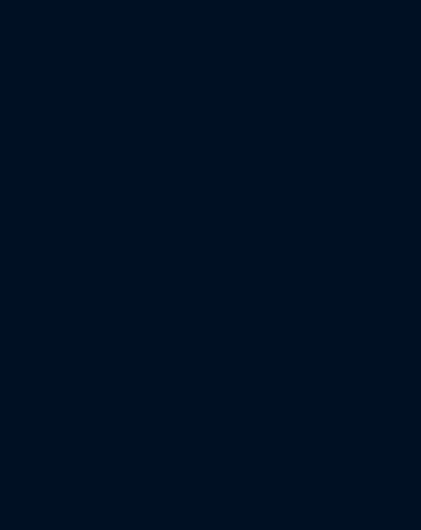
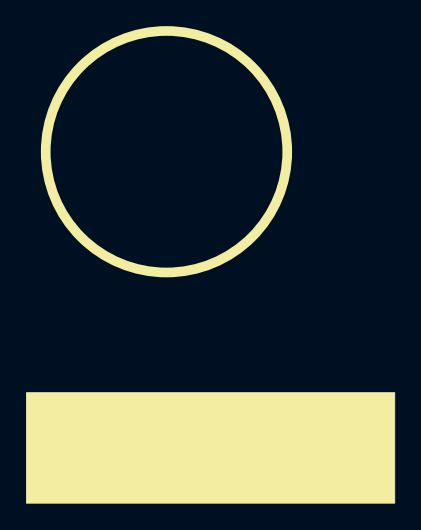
drawing: none -> [40, 26, 293, 278]
drawing: none -> [26, 392, 396, 504]

